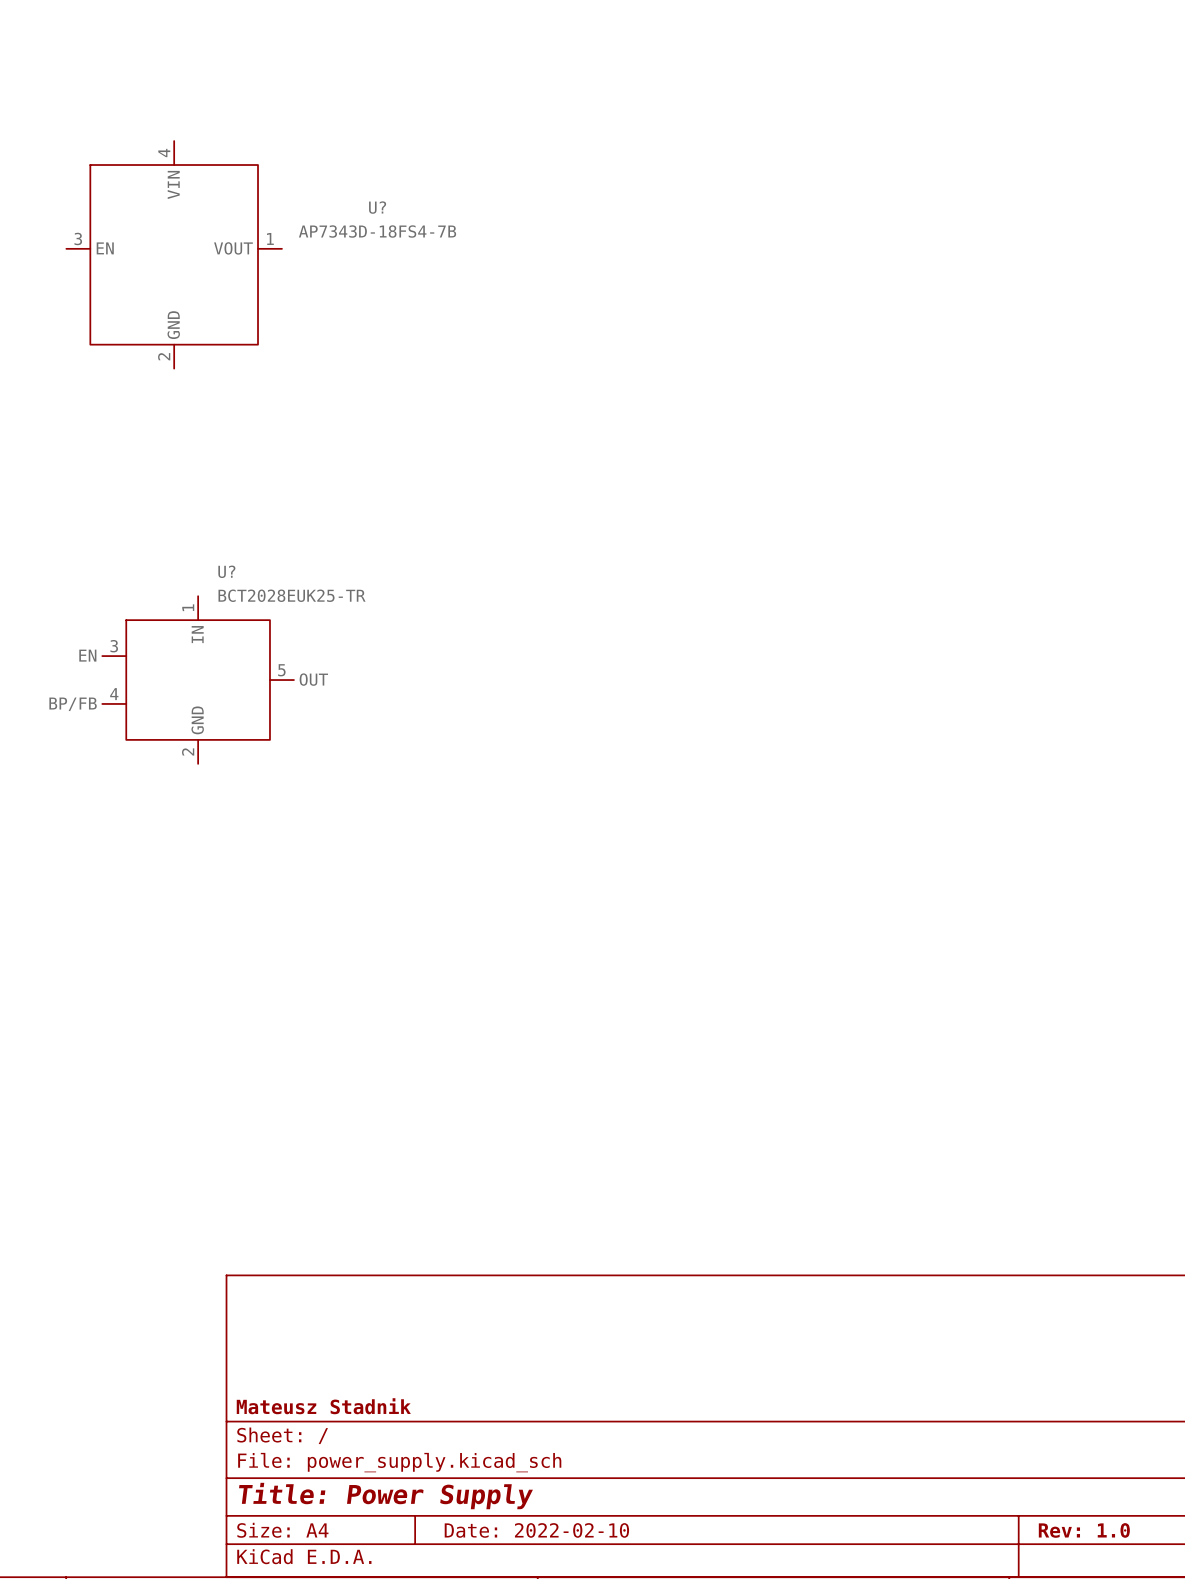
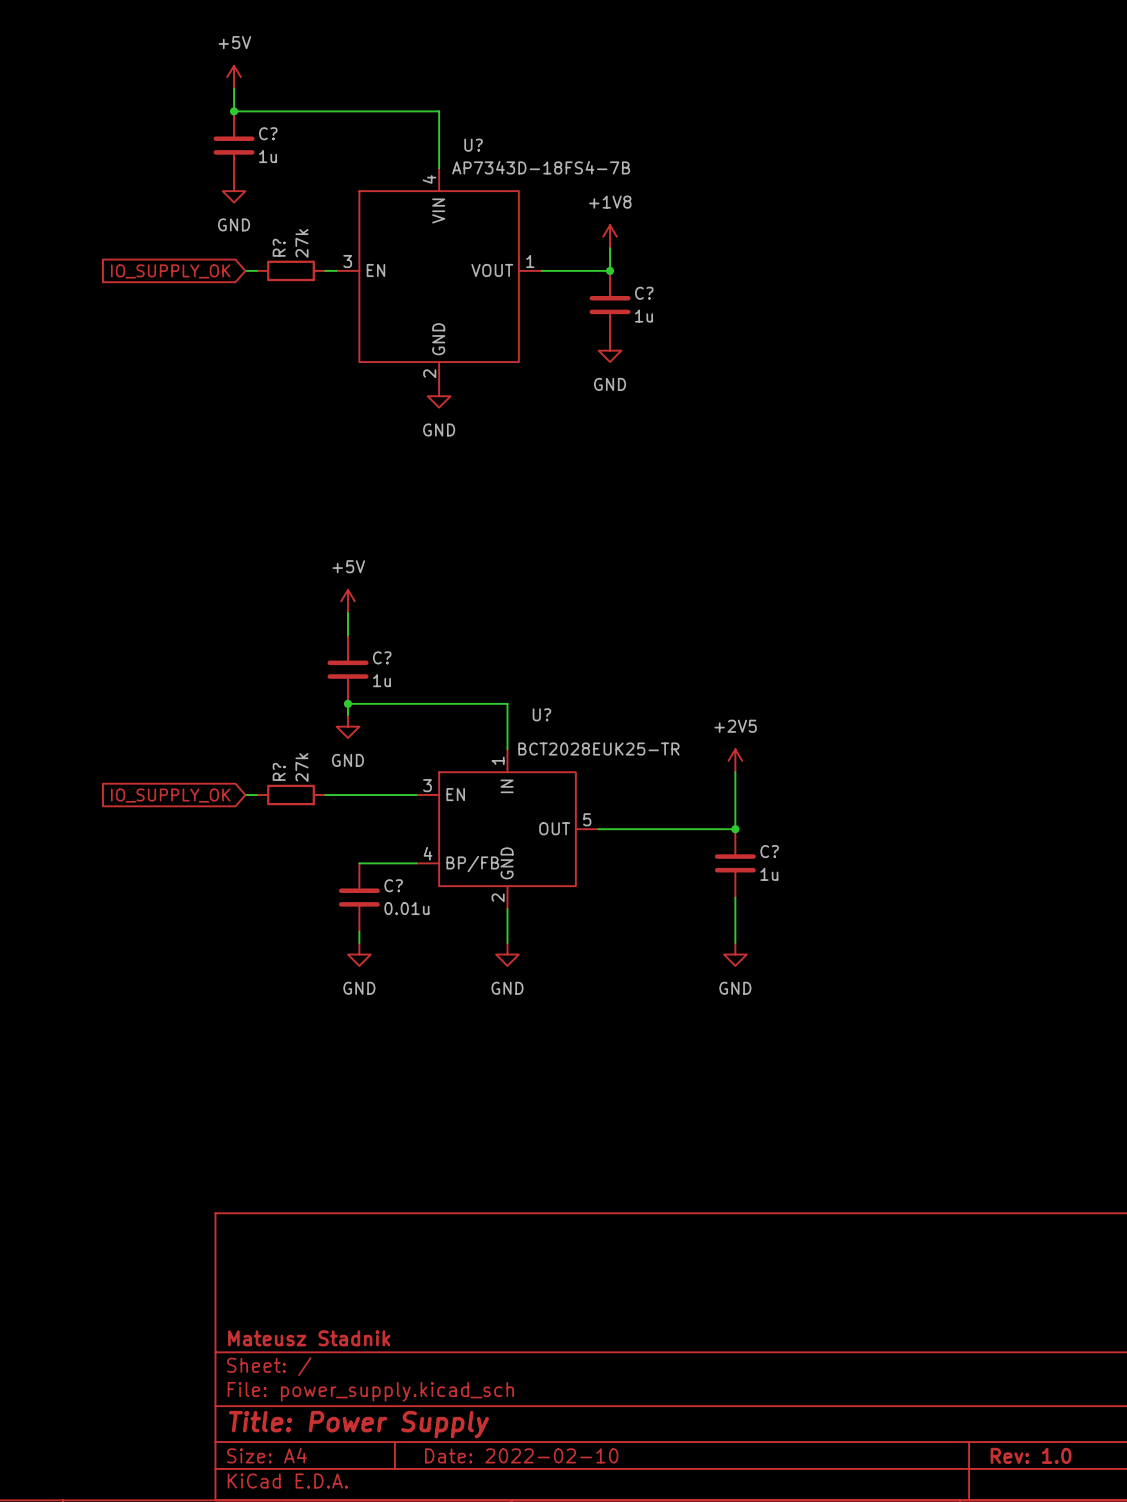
power symbol: none -> +5V (234, 77)
wire: none -> (234, 88) (234, 111) (439, 111) (439, 168)
junction: none -> (234, 111)
C?: none -> 1u (234, 145)
power symbol: none -> GND (234, 191)
power symbol: none -> +1V8 (610, 236)
U?: AP7343D-18FS4-7B (174, 254) -> none
wire: none -> (610, 248) (610, 270) (541, 270)
wire: none -> (245, 270) (256, 270)
R?: none -> 27k (291, 270)
wire: none -> (325, 270) (336, 270)
junction: none -> (610, 270)
global label: none -> IO_SUPPLY_OK (170, 271)
U?: none -> AP7343D-18FS4-7B (439, 276)
C?: none -> 1u (610, 305)
power symbol: none -> GND (610, 350)
power symbol: none -> GND (439, 396)
power symbol: none -> +5V (347, 601)
wire: none -> (347, 612) (347, 635)
U?: BCT2028EUK25-TR (198, 680) -> none
C?: none -> 1u (347, 669)
junction: none -> (347, 703)
wire: none -> (347, 715) (347, 703) (507, 703) (507, 749)
power symbol: none -> GND (347, 726)
power symbol: none -> +2V5 (735, 760)
wire: none -> (735, 772) (735, 829) (598, 829)
wire: none -> (245, 795) (256, 795)
R?: none -> 27k (291, 795)
wire: none -> (325, 795) (416, 795)
global label: none -> IO_SUPPLY_OK (170, 795)
U?: none -> BCT2028EUK25-TR (507, 829)
junction: none -> (735, 829)
wire: none -> (359, 863) (416, 863)
C?: none -> 1u (735, 863)
C?: none -> 0.01u (359, 897)
wire: none -> (735, 897) (735, 943)
wire: none -> (507, 908) (507, 943)
wire: none -> (359, 931) (359, 943)
power symbol: none -> GND (359, 954)
power symbol: none -> GND (507, 954)
power symbol: none -> GND (735, 954)

